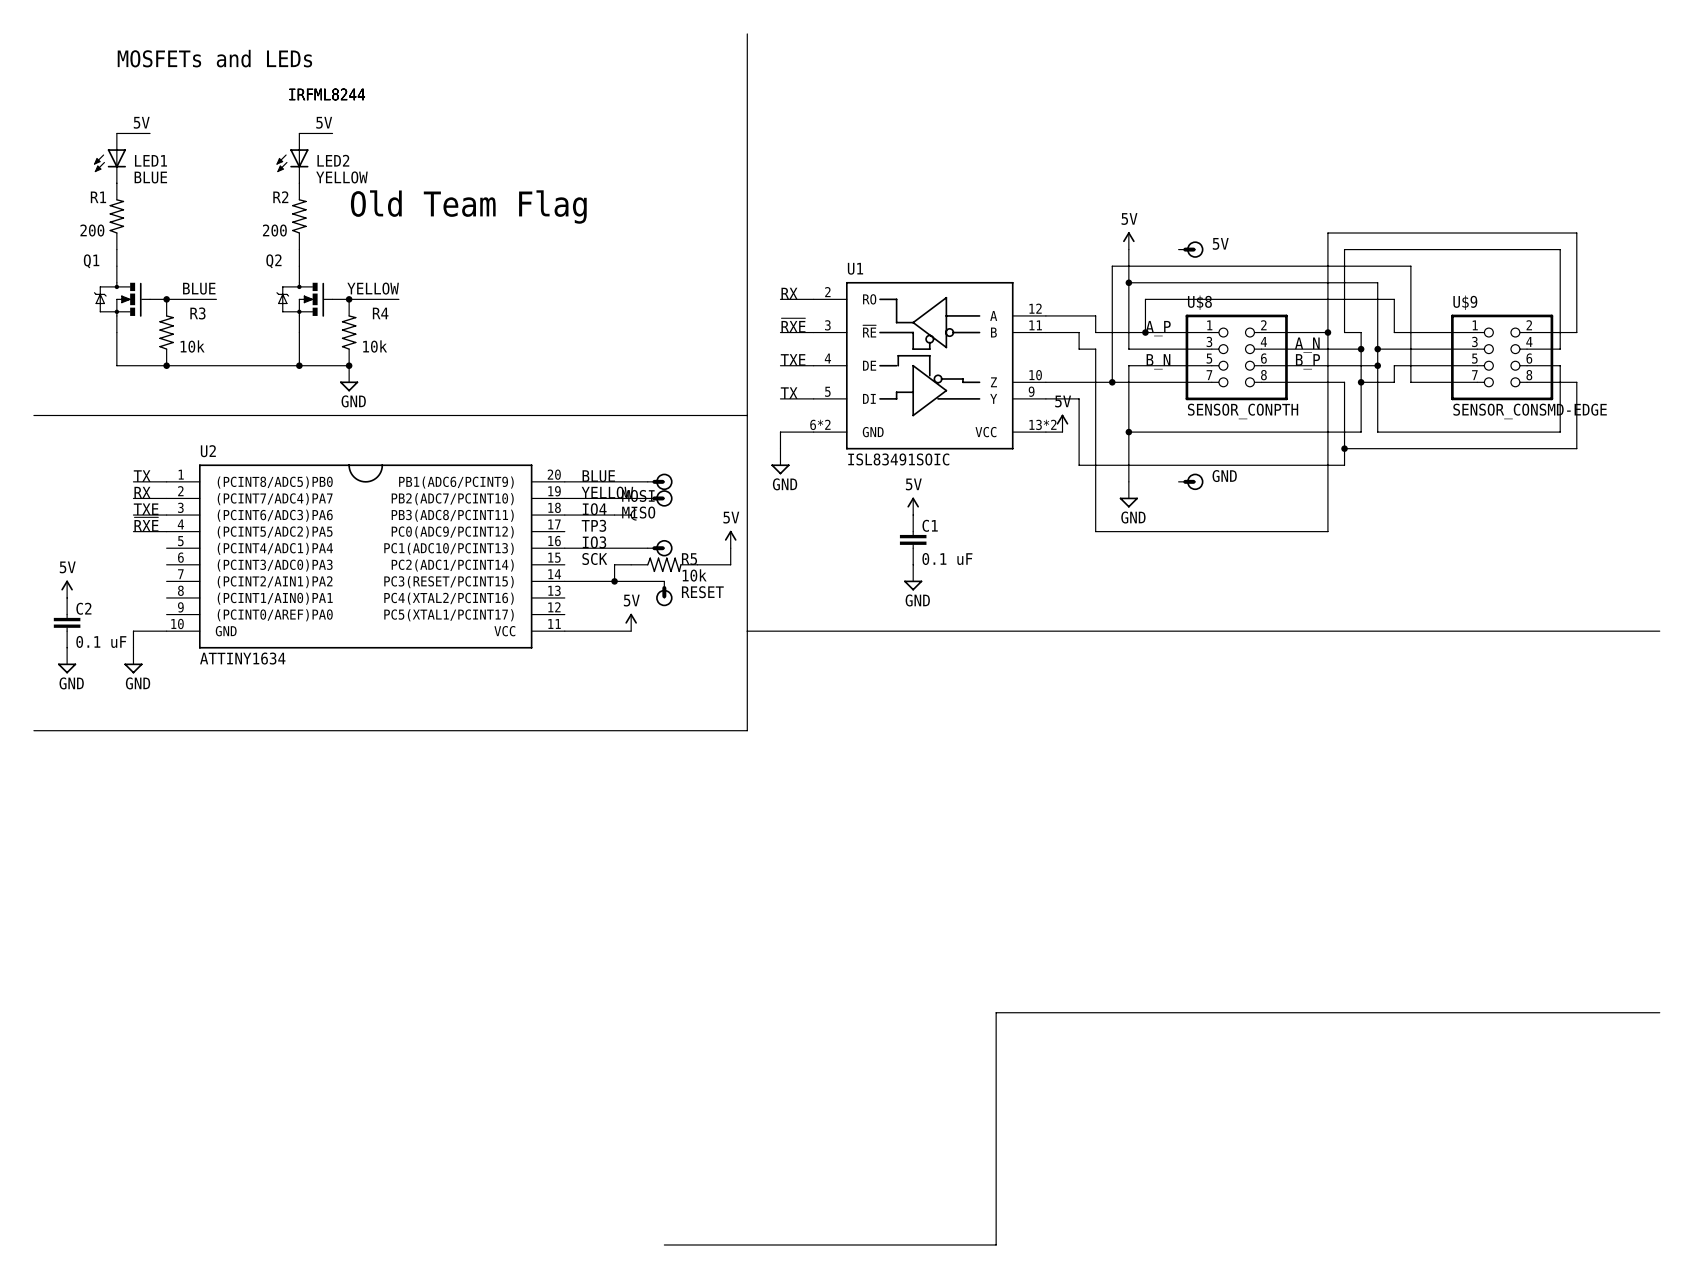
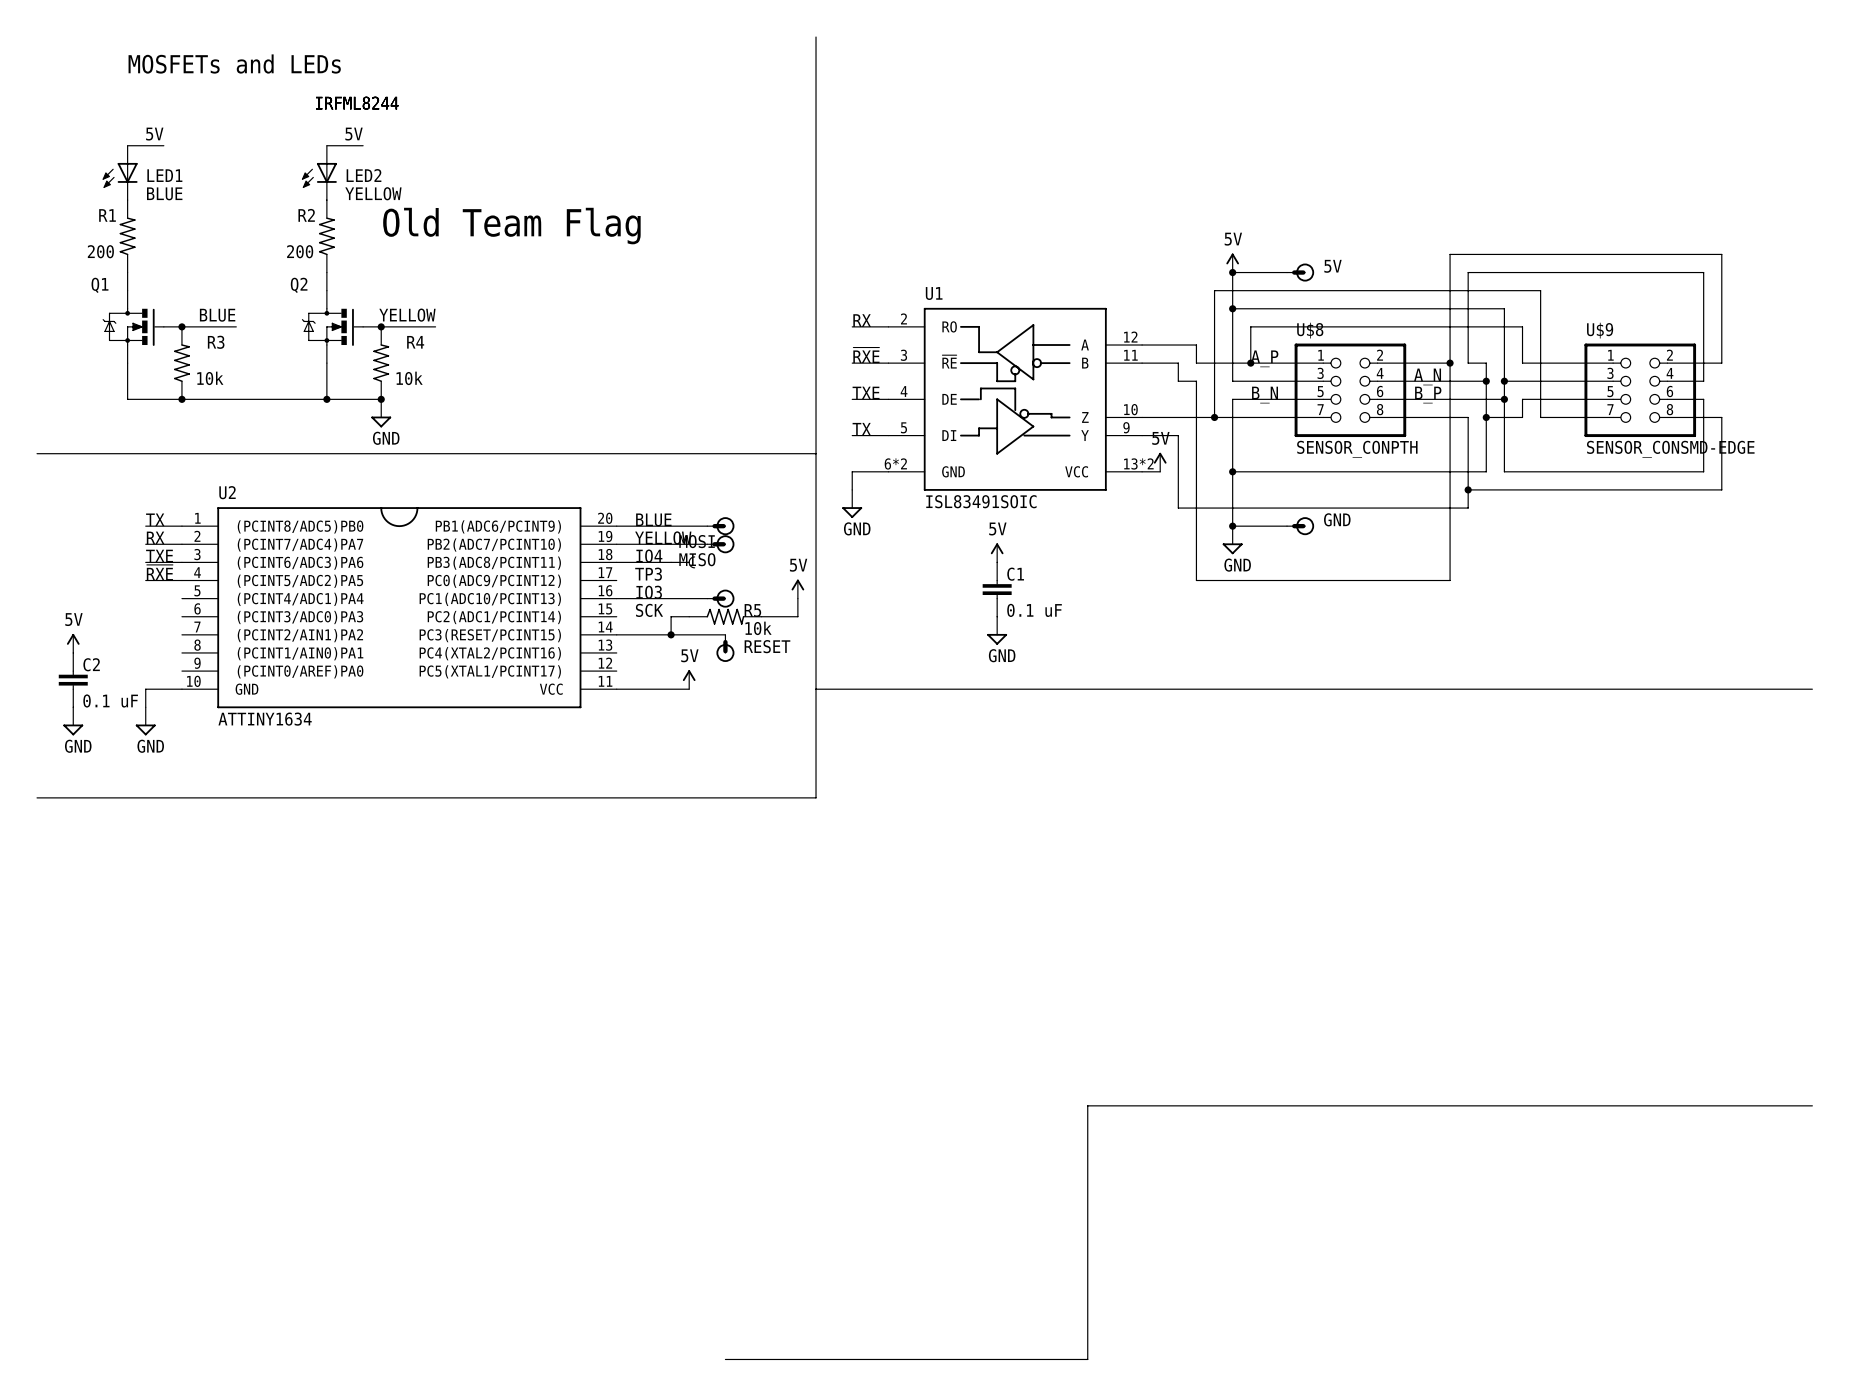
wire: none -> (1232, 272) (1287, 272)
junction: none -> (1232, 272)
wire: none -> (1232, 526) (1287, 526)
junction: none -> (1232, 526)

